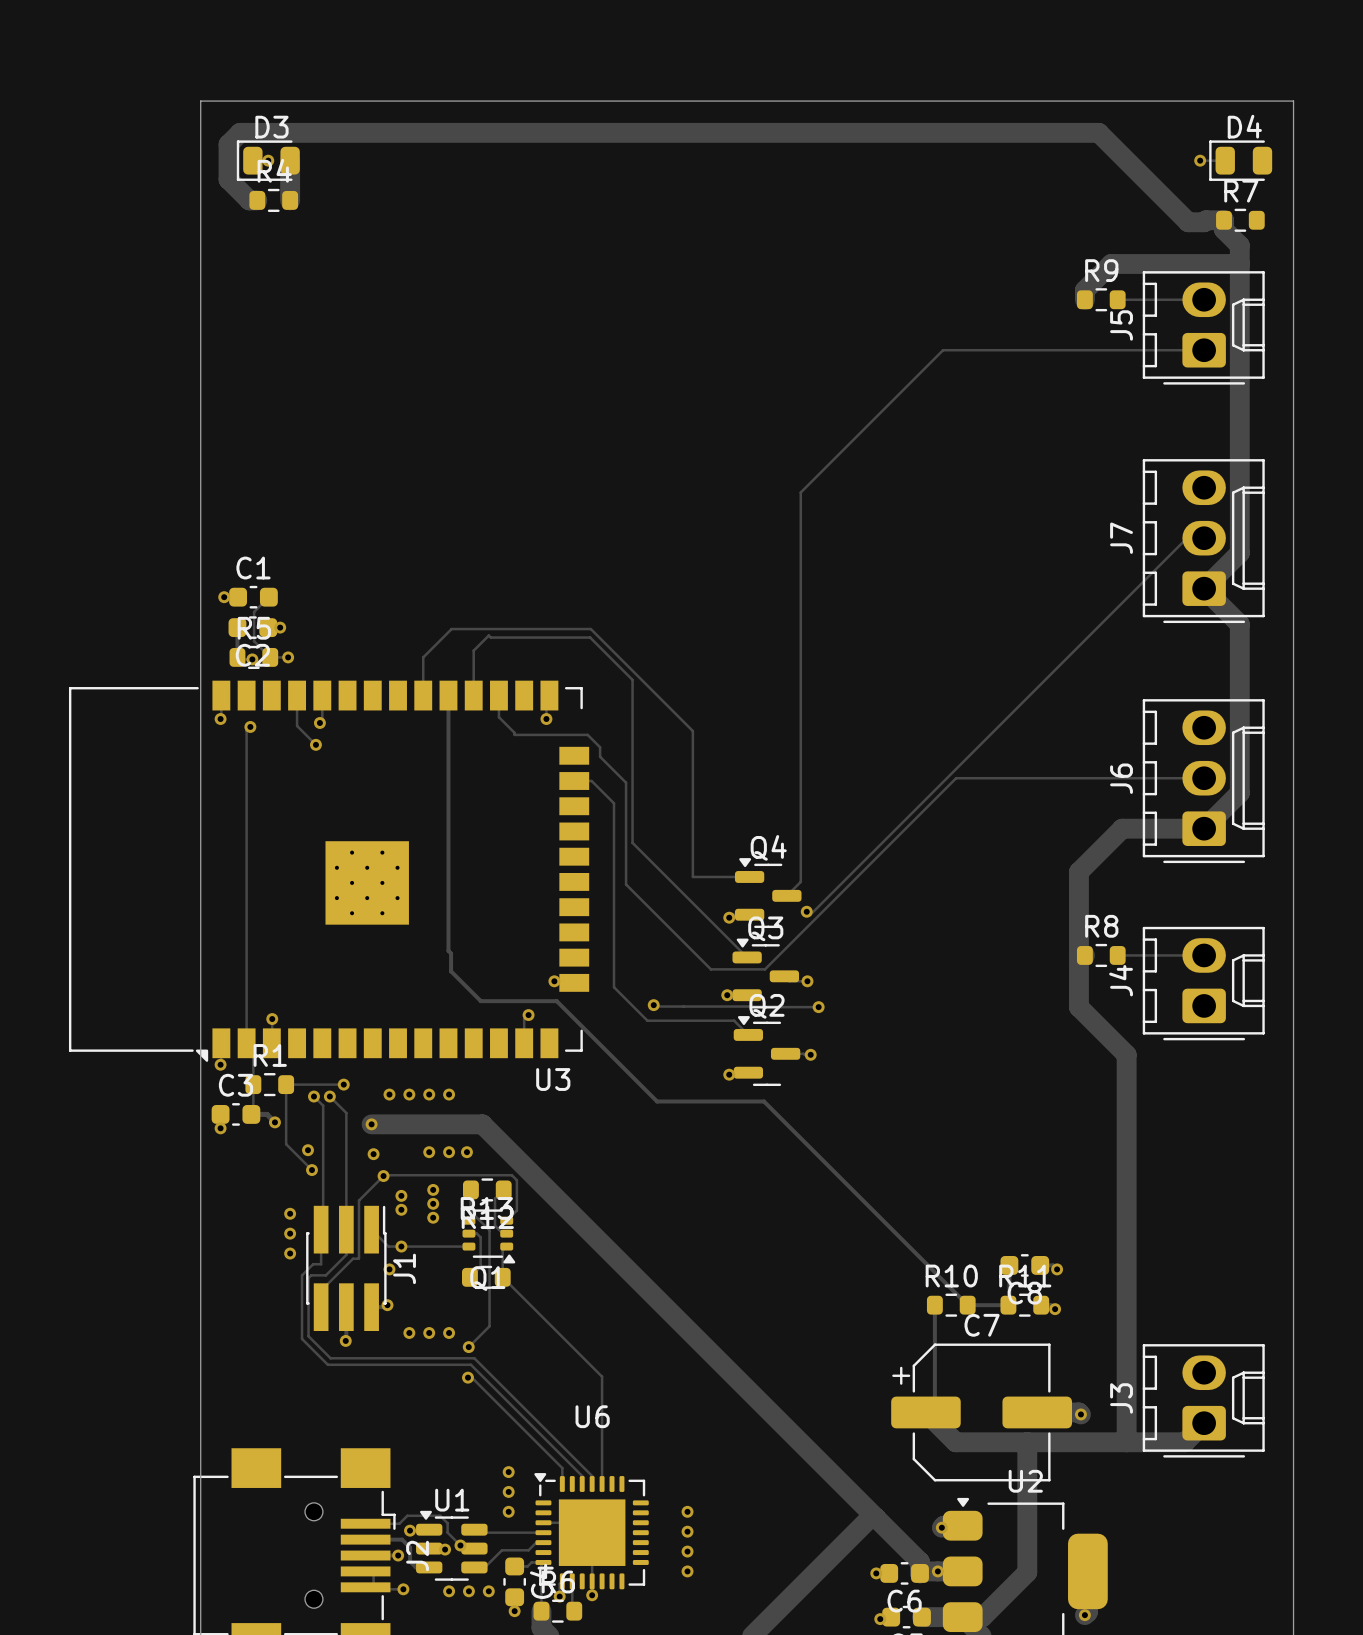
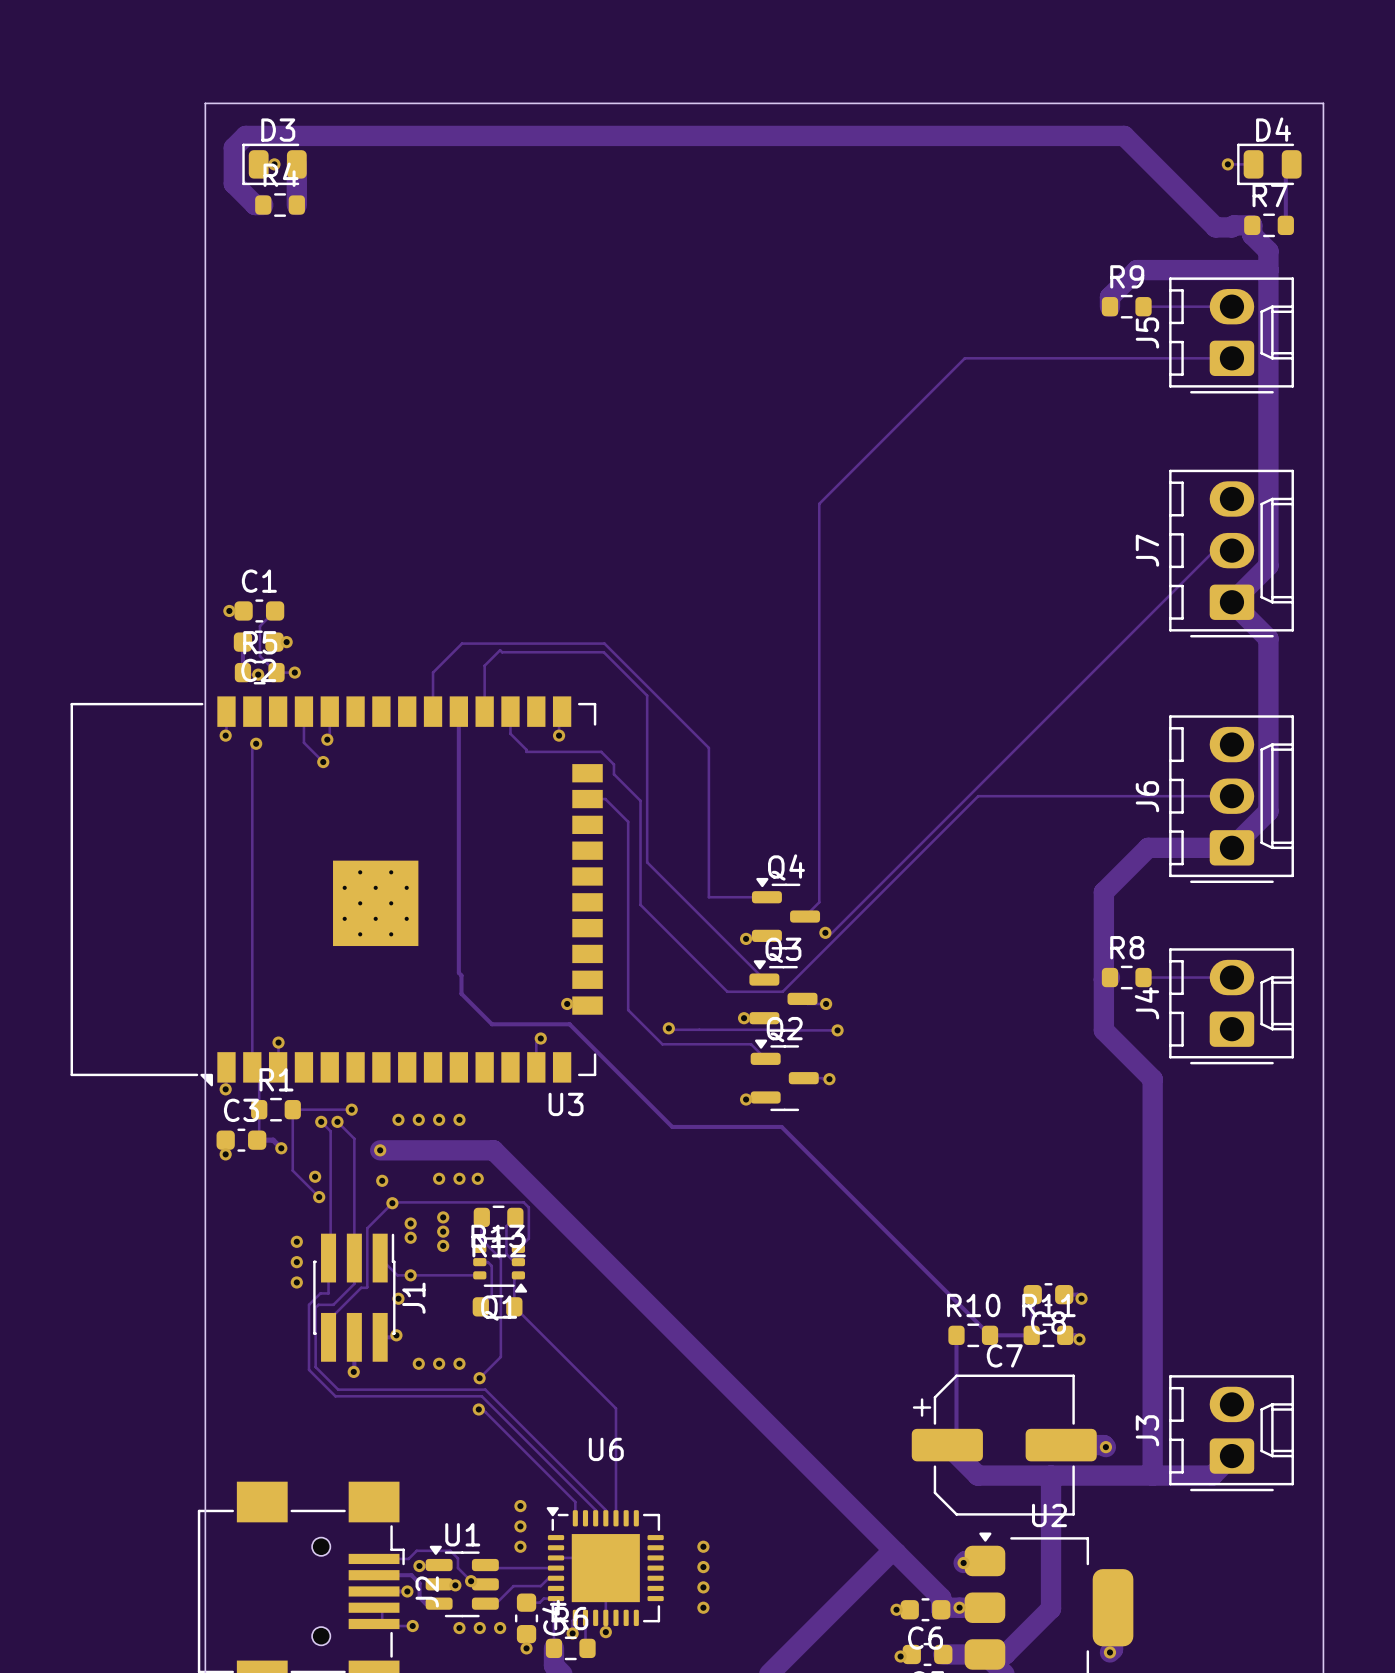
track: none -> (1291, 164) (1285, 170) (1285, 225)

